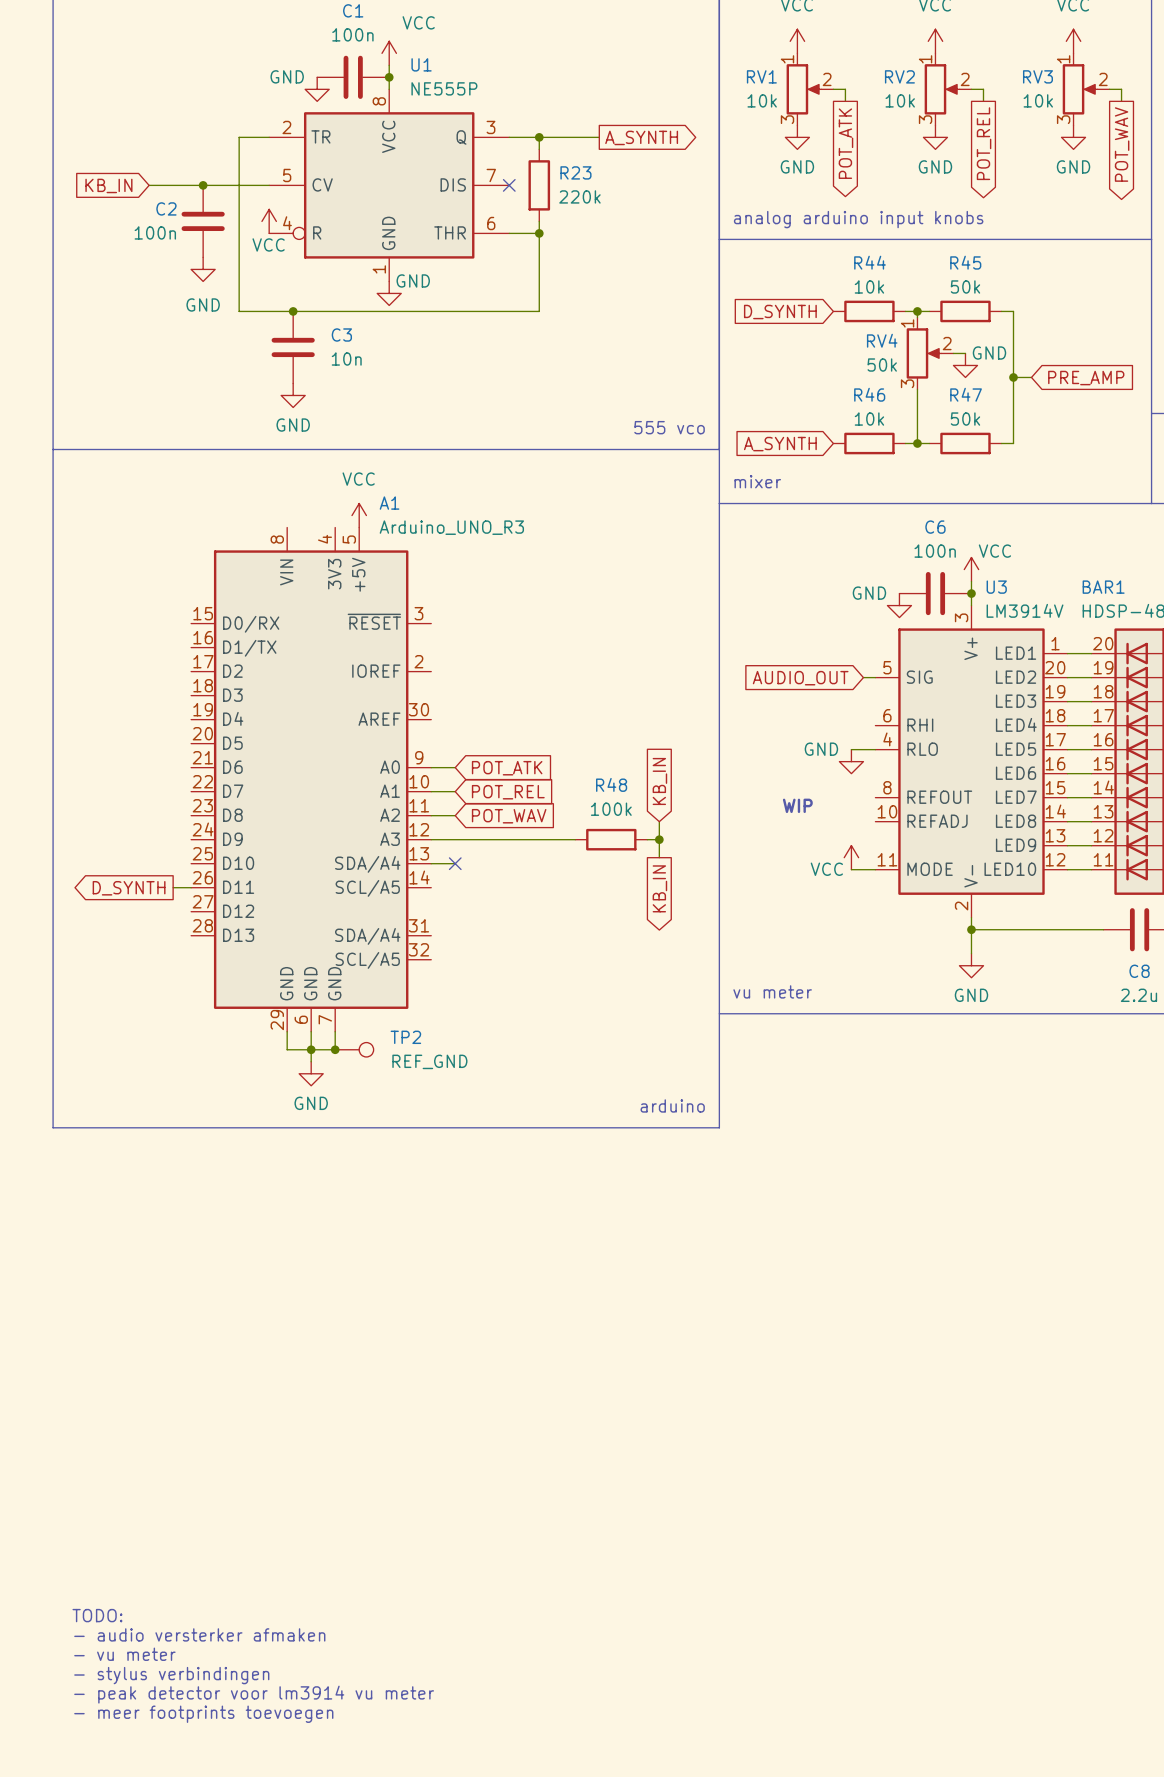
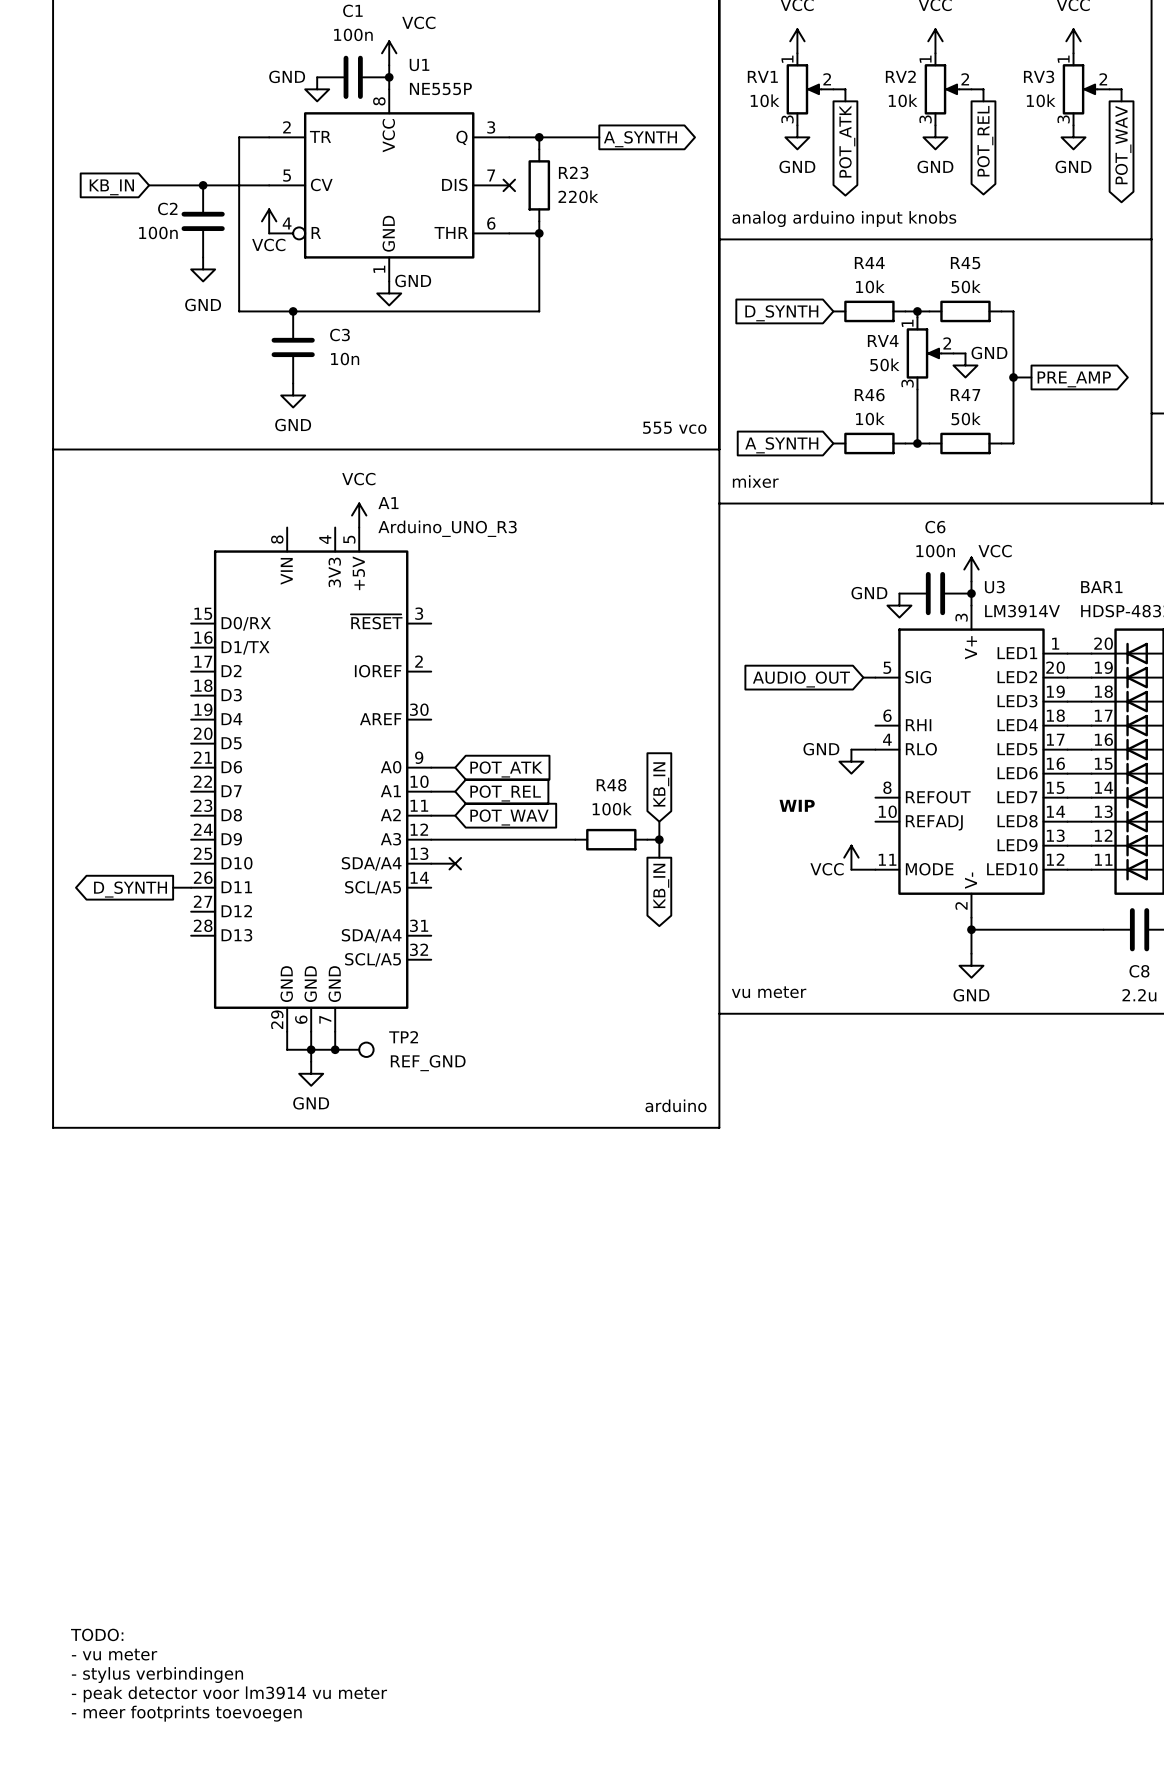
global label shape: input (1086, 378) -> output (1074, 379)
text: TODO: (97, 1615) -> none
text: - audio versterker afmaken (199, 1634) -> TODO: (97, 1634)

